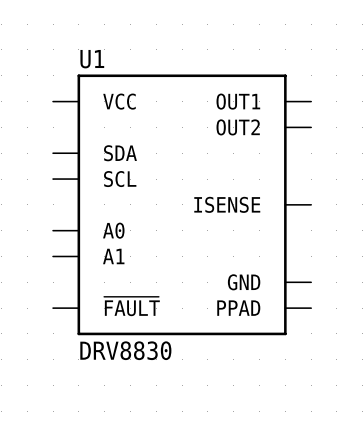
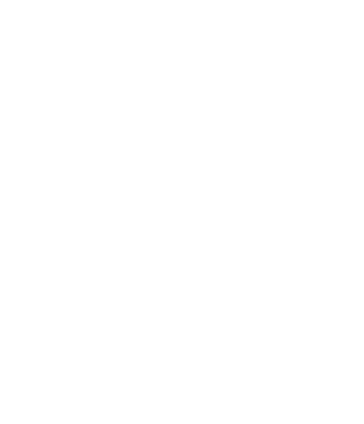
U1: DRV8830 (182, 204) -> none

